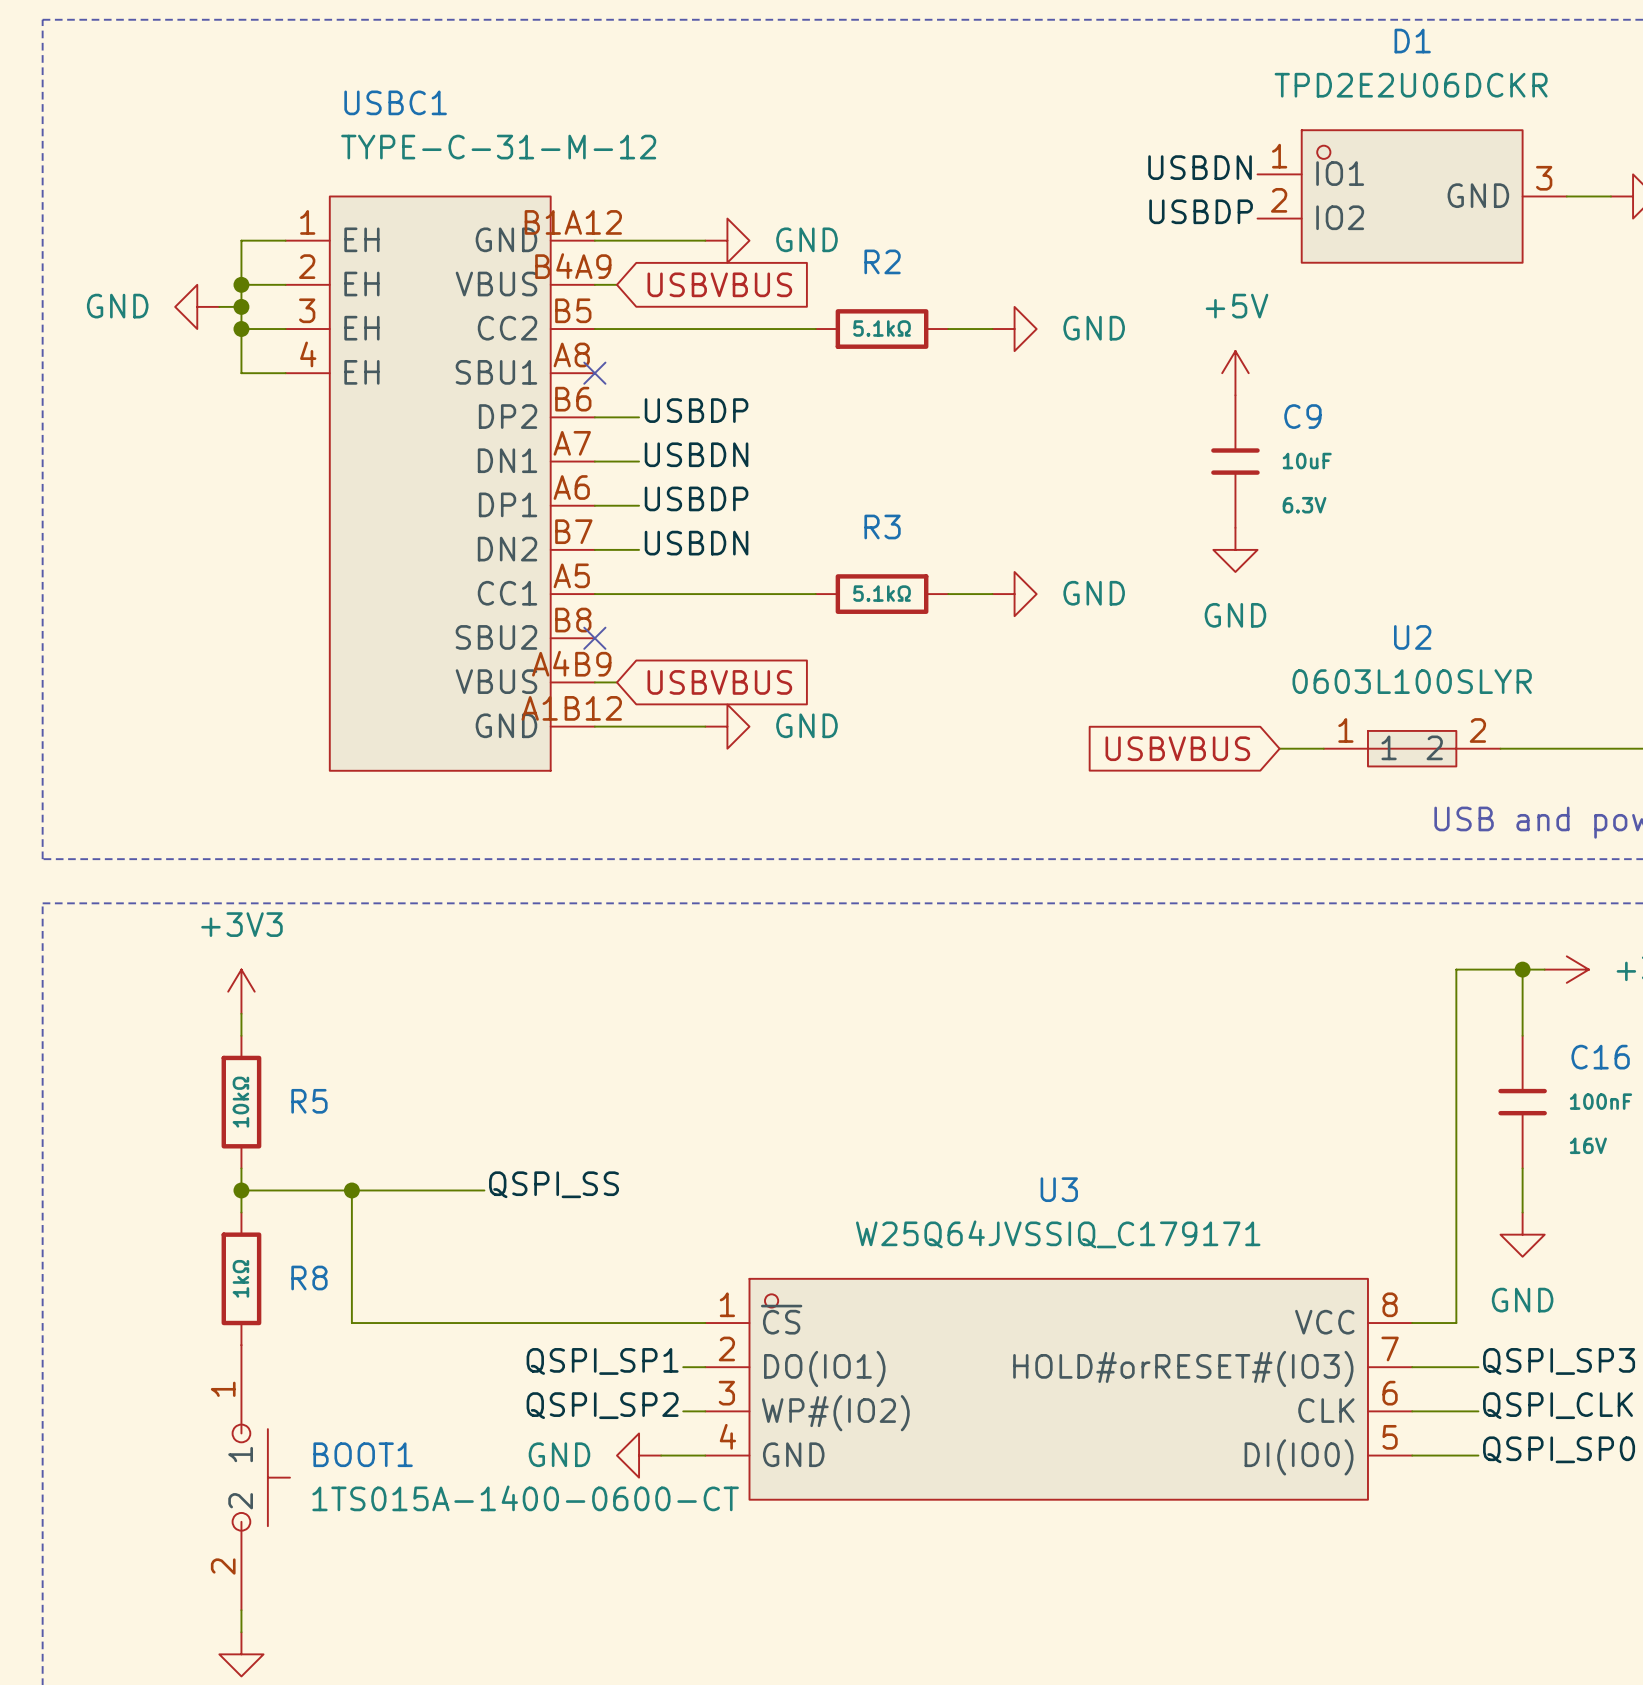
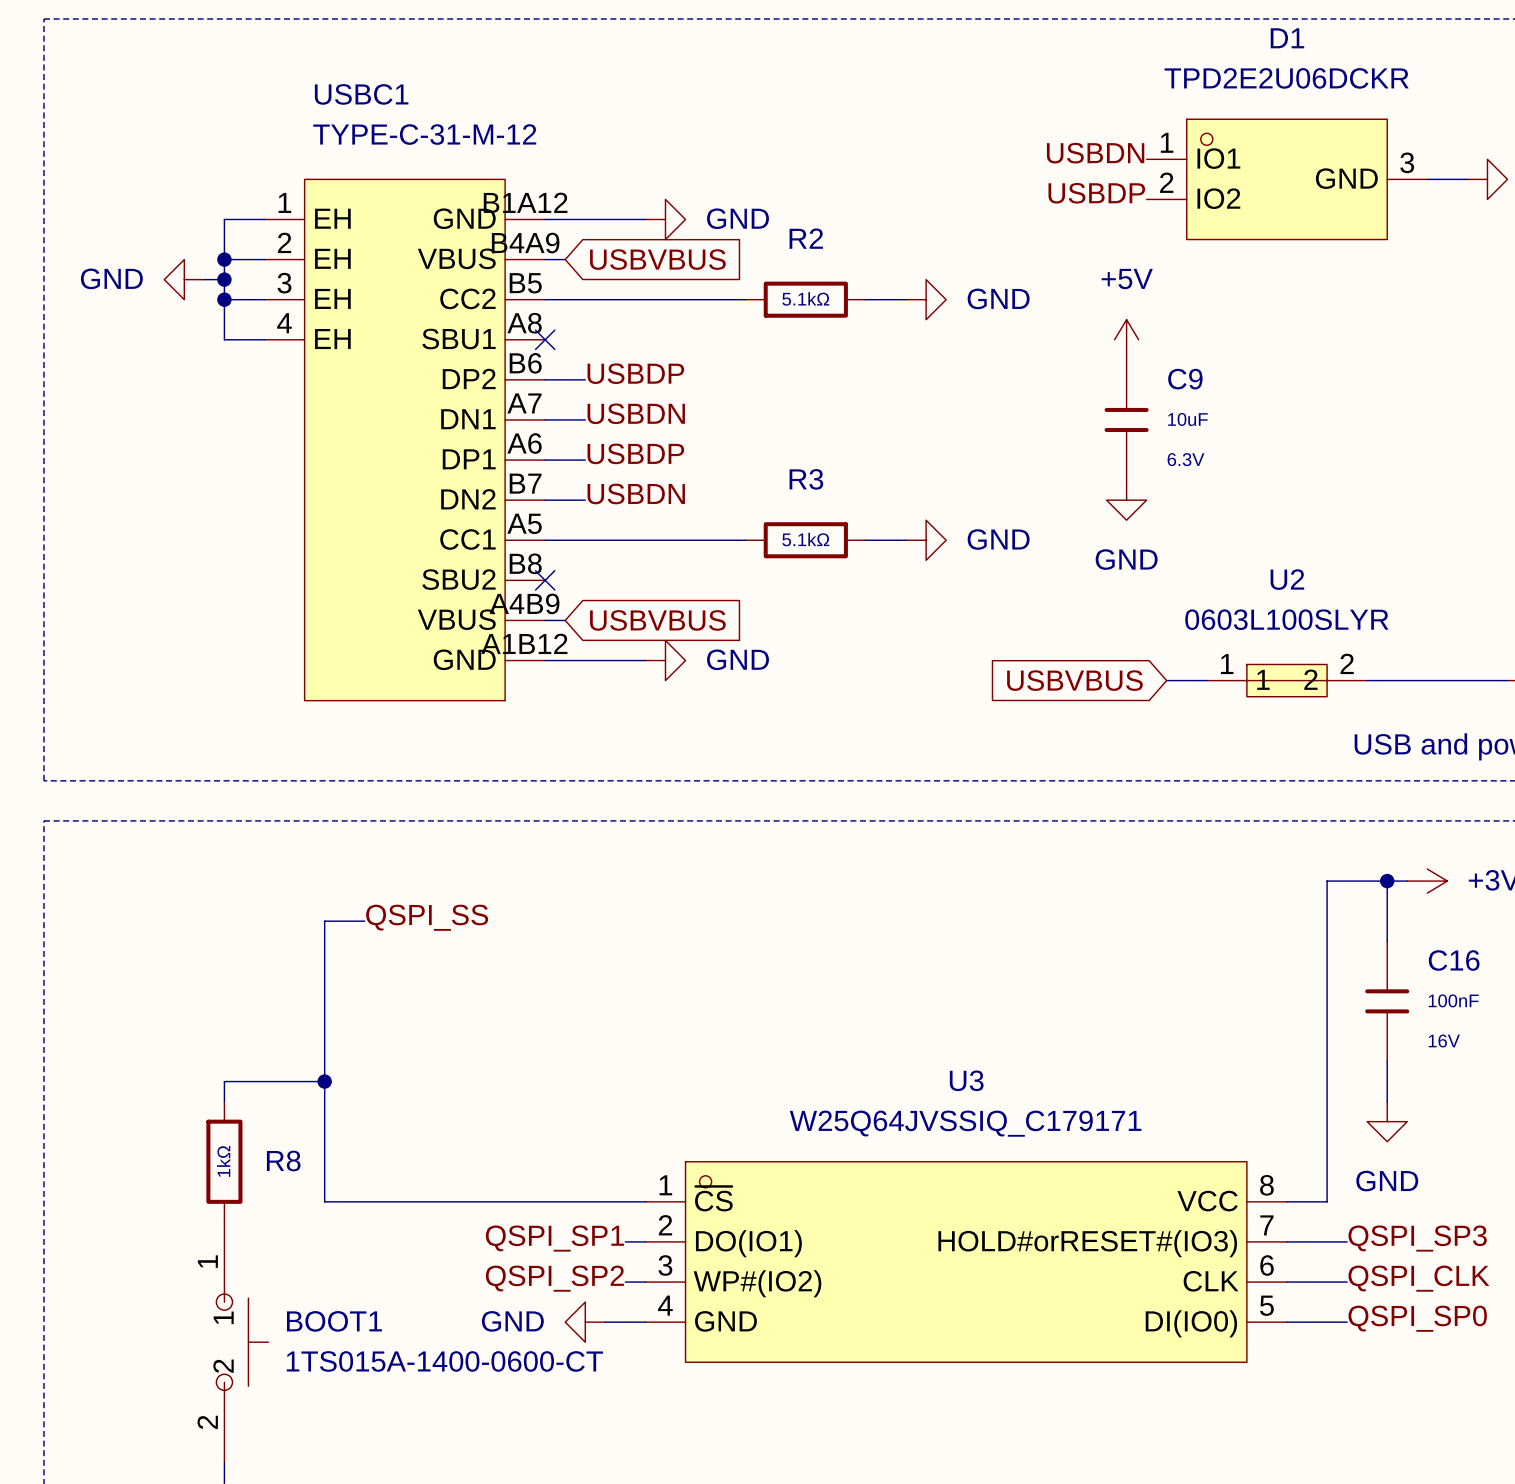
power symbol: +3V3 (241, 991) -> none
wire: (241, 1013) (241, 1035) -> none
R5: 10kΩ (241, 1102) -> none
wire: (241, 1168) (241, 1190) -> none
label position: QSPI_SS (554, 1184) -> QSPI_SS (427, 917)
junction: (241, 1190) -> none
wire: (351, 1190) (484, 1190) -> (324, 1081) (324, 921) (364, 921)

